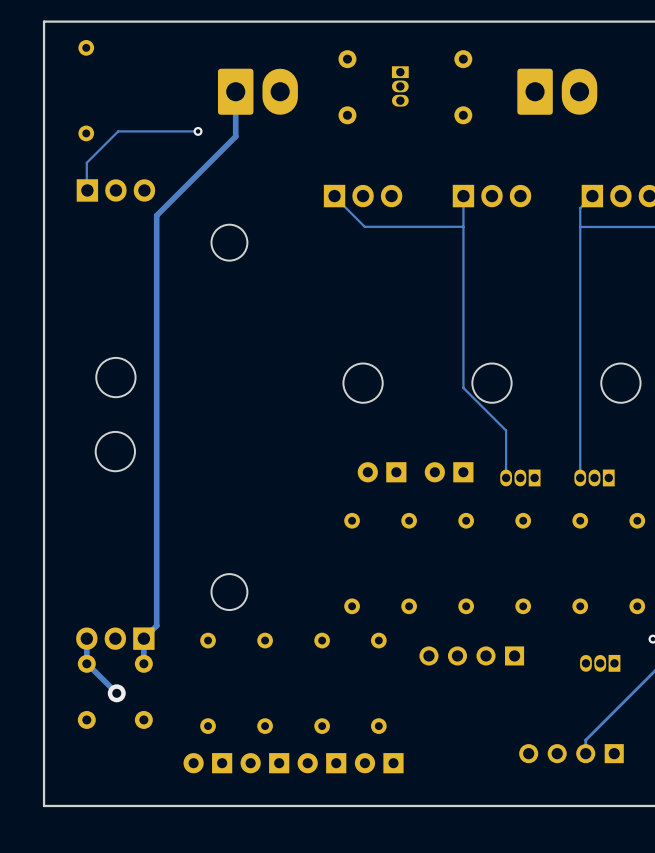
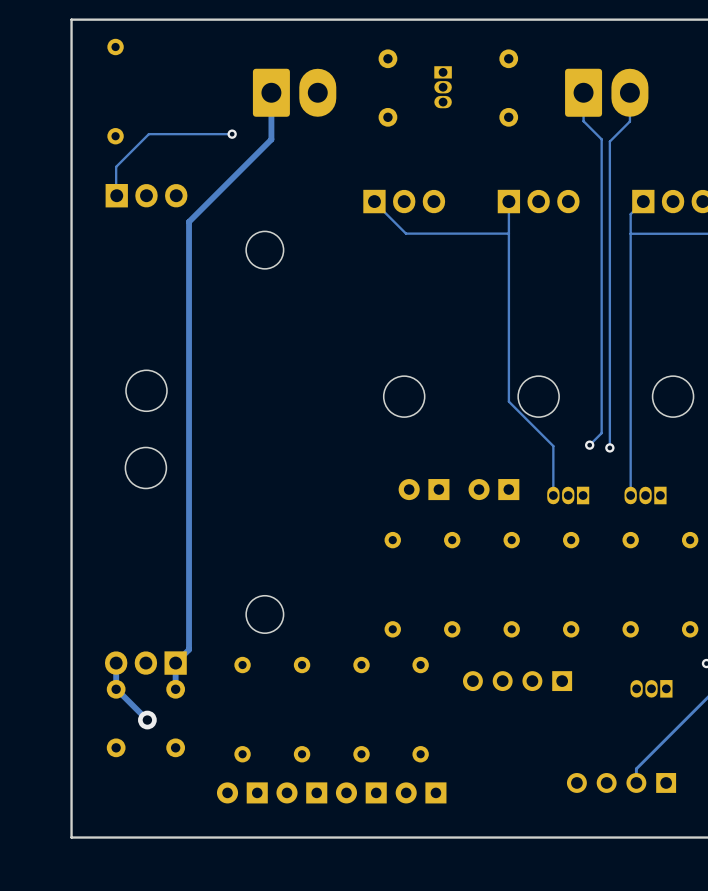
track: none -> (583, 92) (583, 121) (601, 139) (601, 433) (589, 445)
track: none -> (629, 92) (629, 121) (609, 141) (609, 447)
via: none -> (589, 445)
via: none -> (609, 447)

